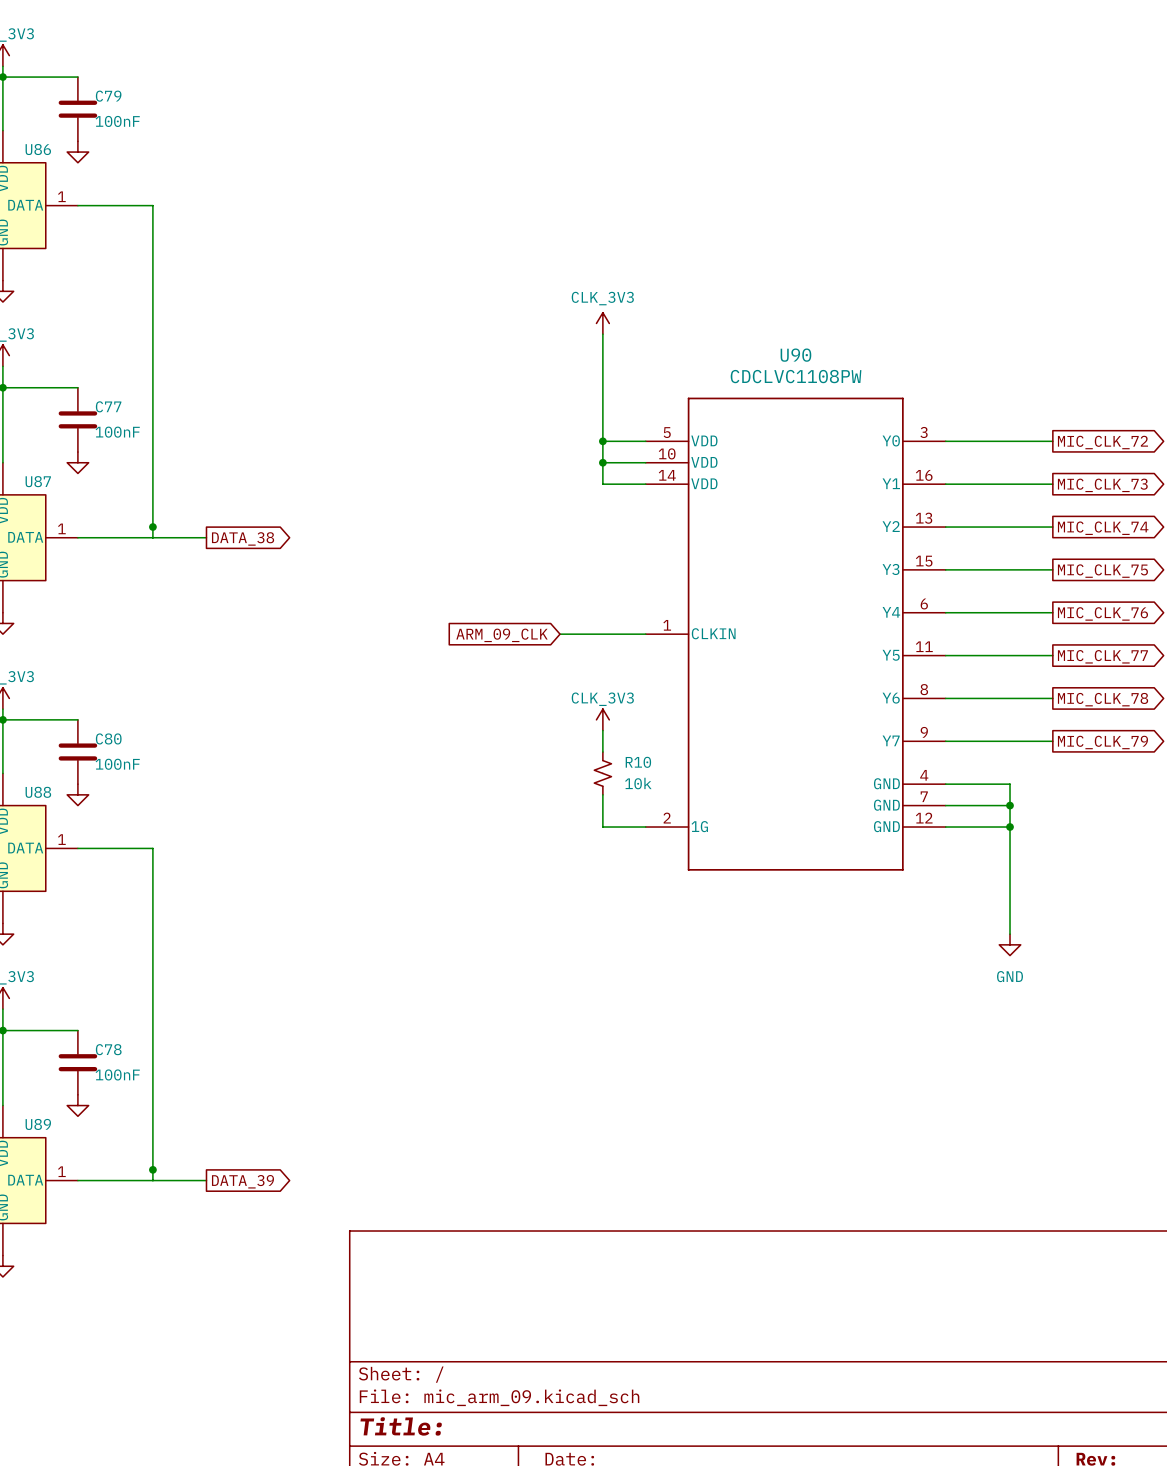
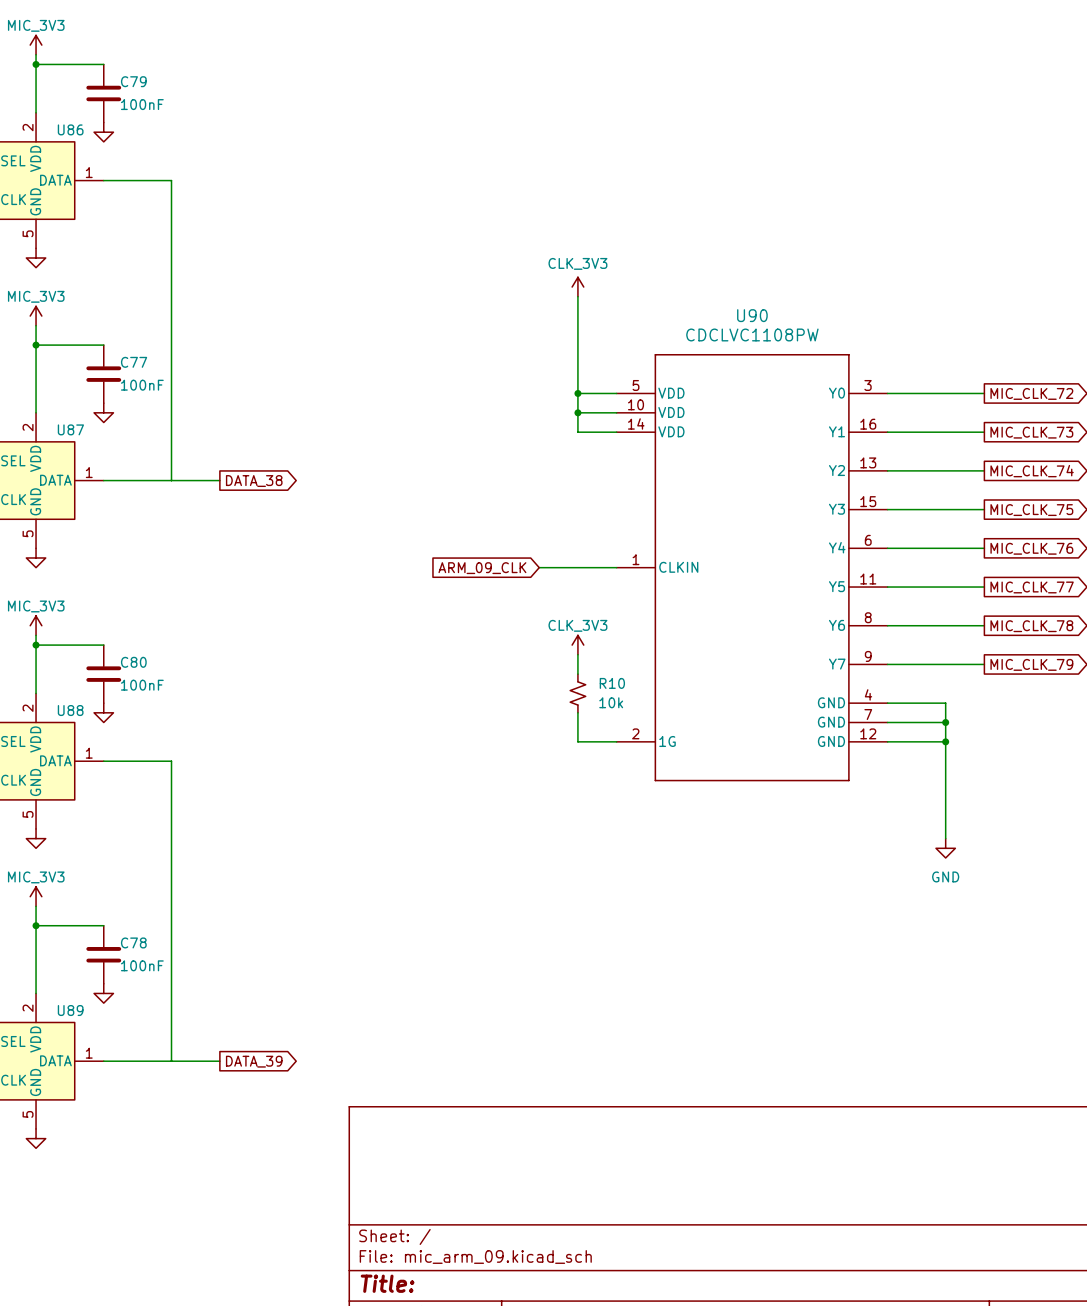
junction: (152, 527) -> none
junction: (152, 1169) -> none

